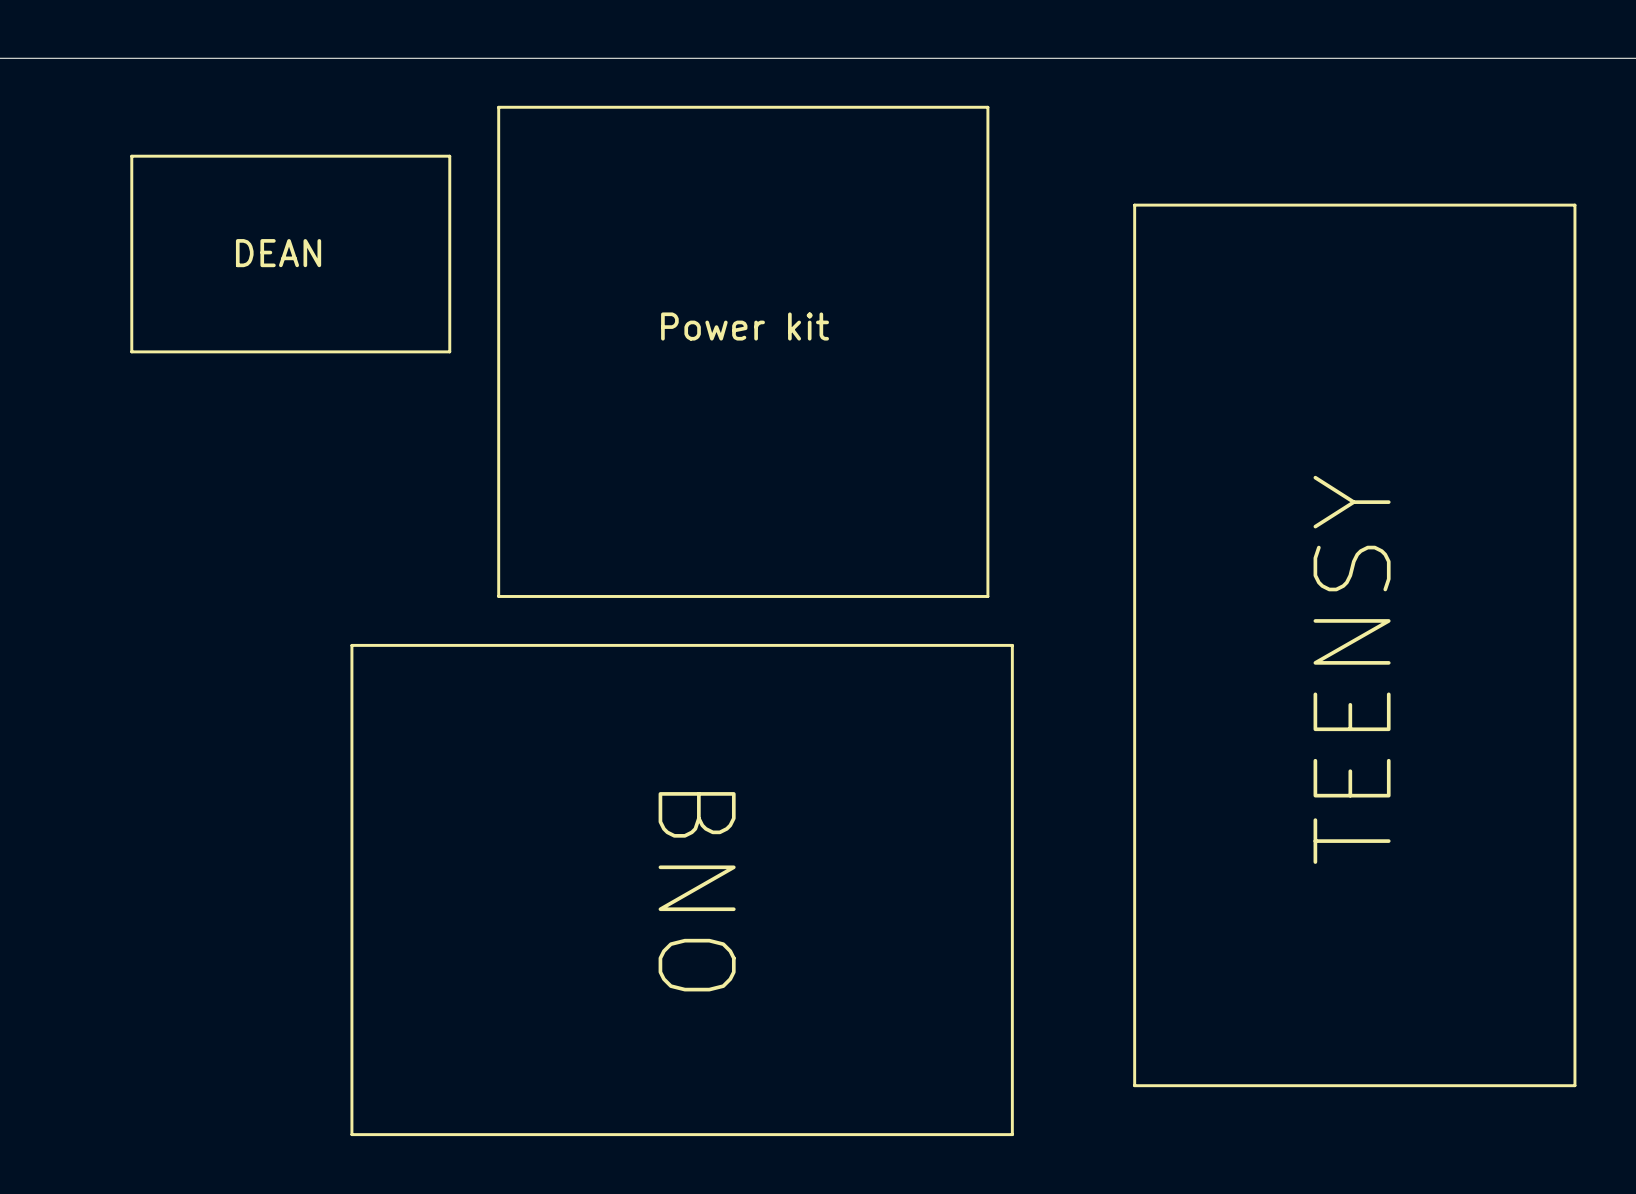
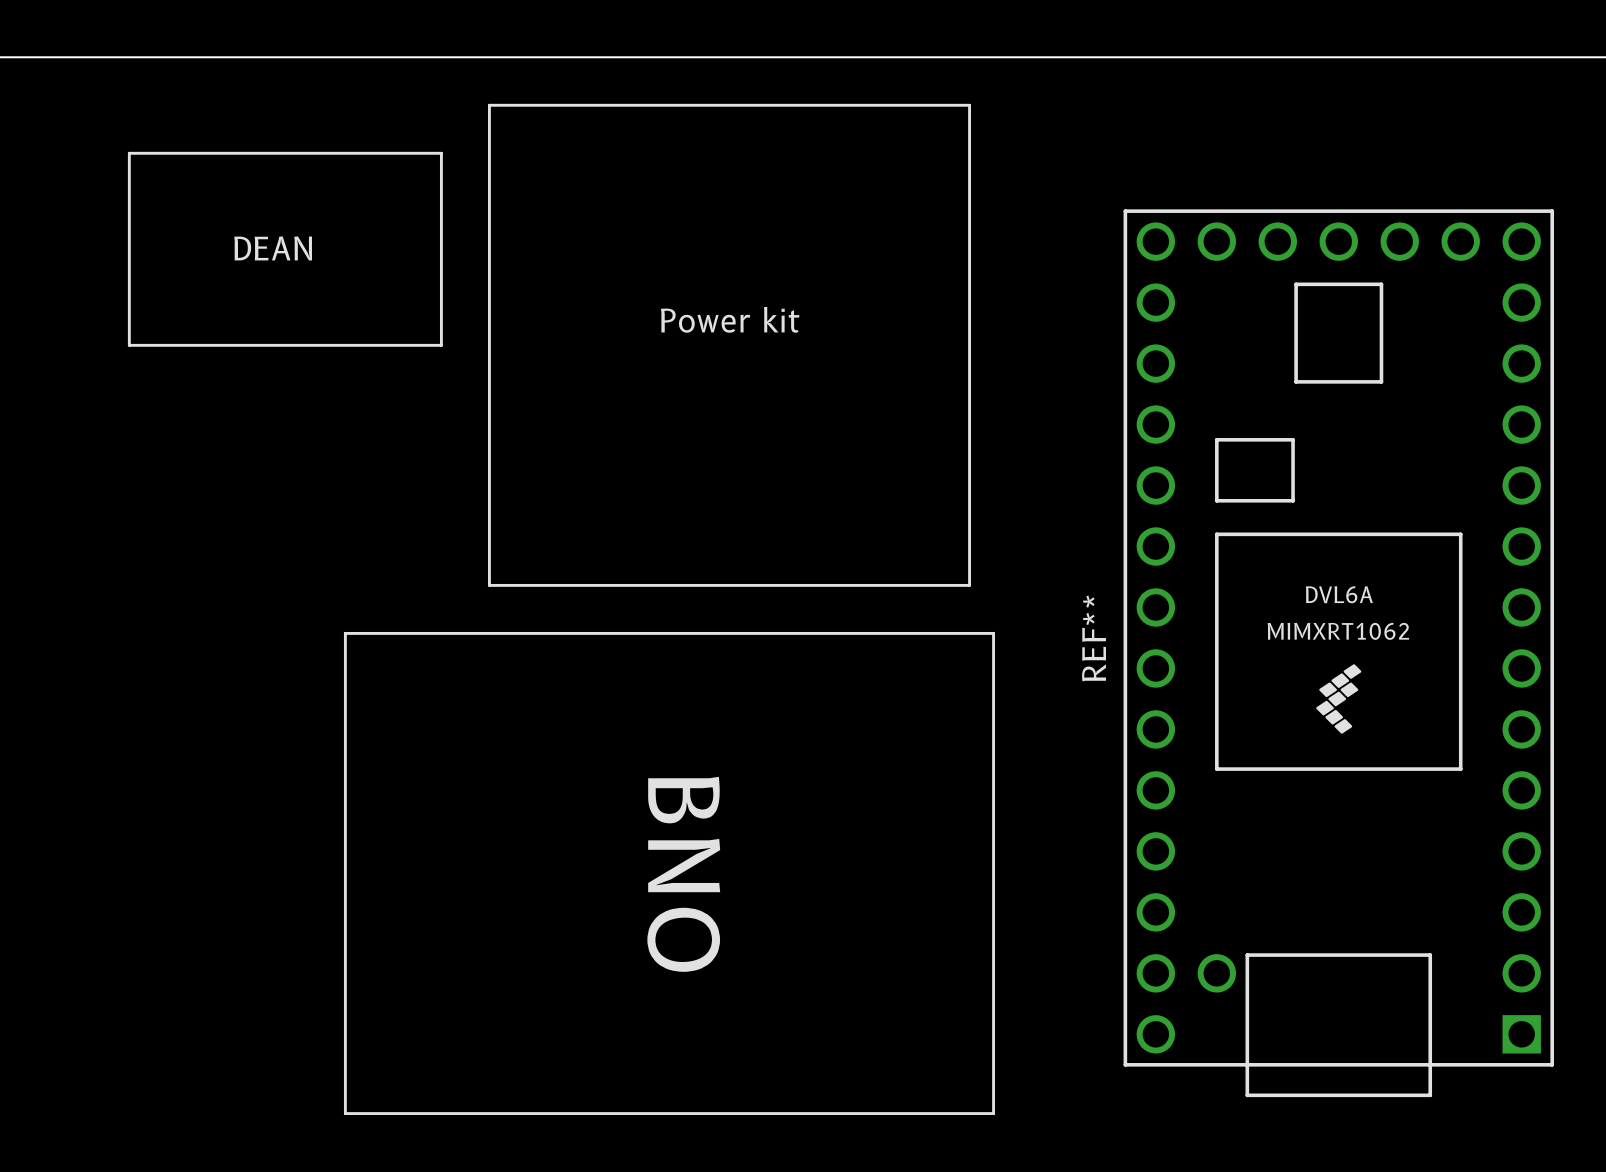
line: (1134, 205) (1134, 1085) (1574, 1085) (1574, 205) (1134, 205) -> none
REF**: none -> (1338, 653)
text: TEENSY (1352, 669) -> none

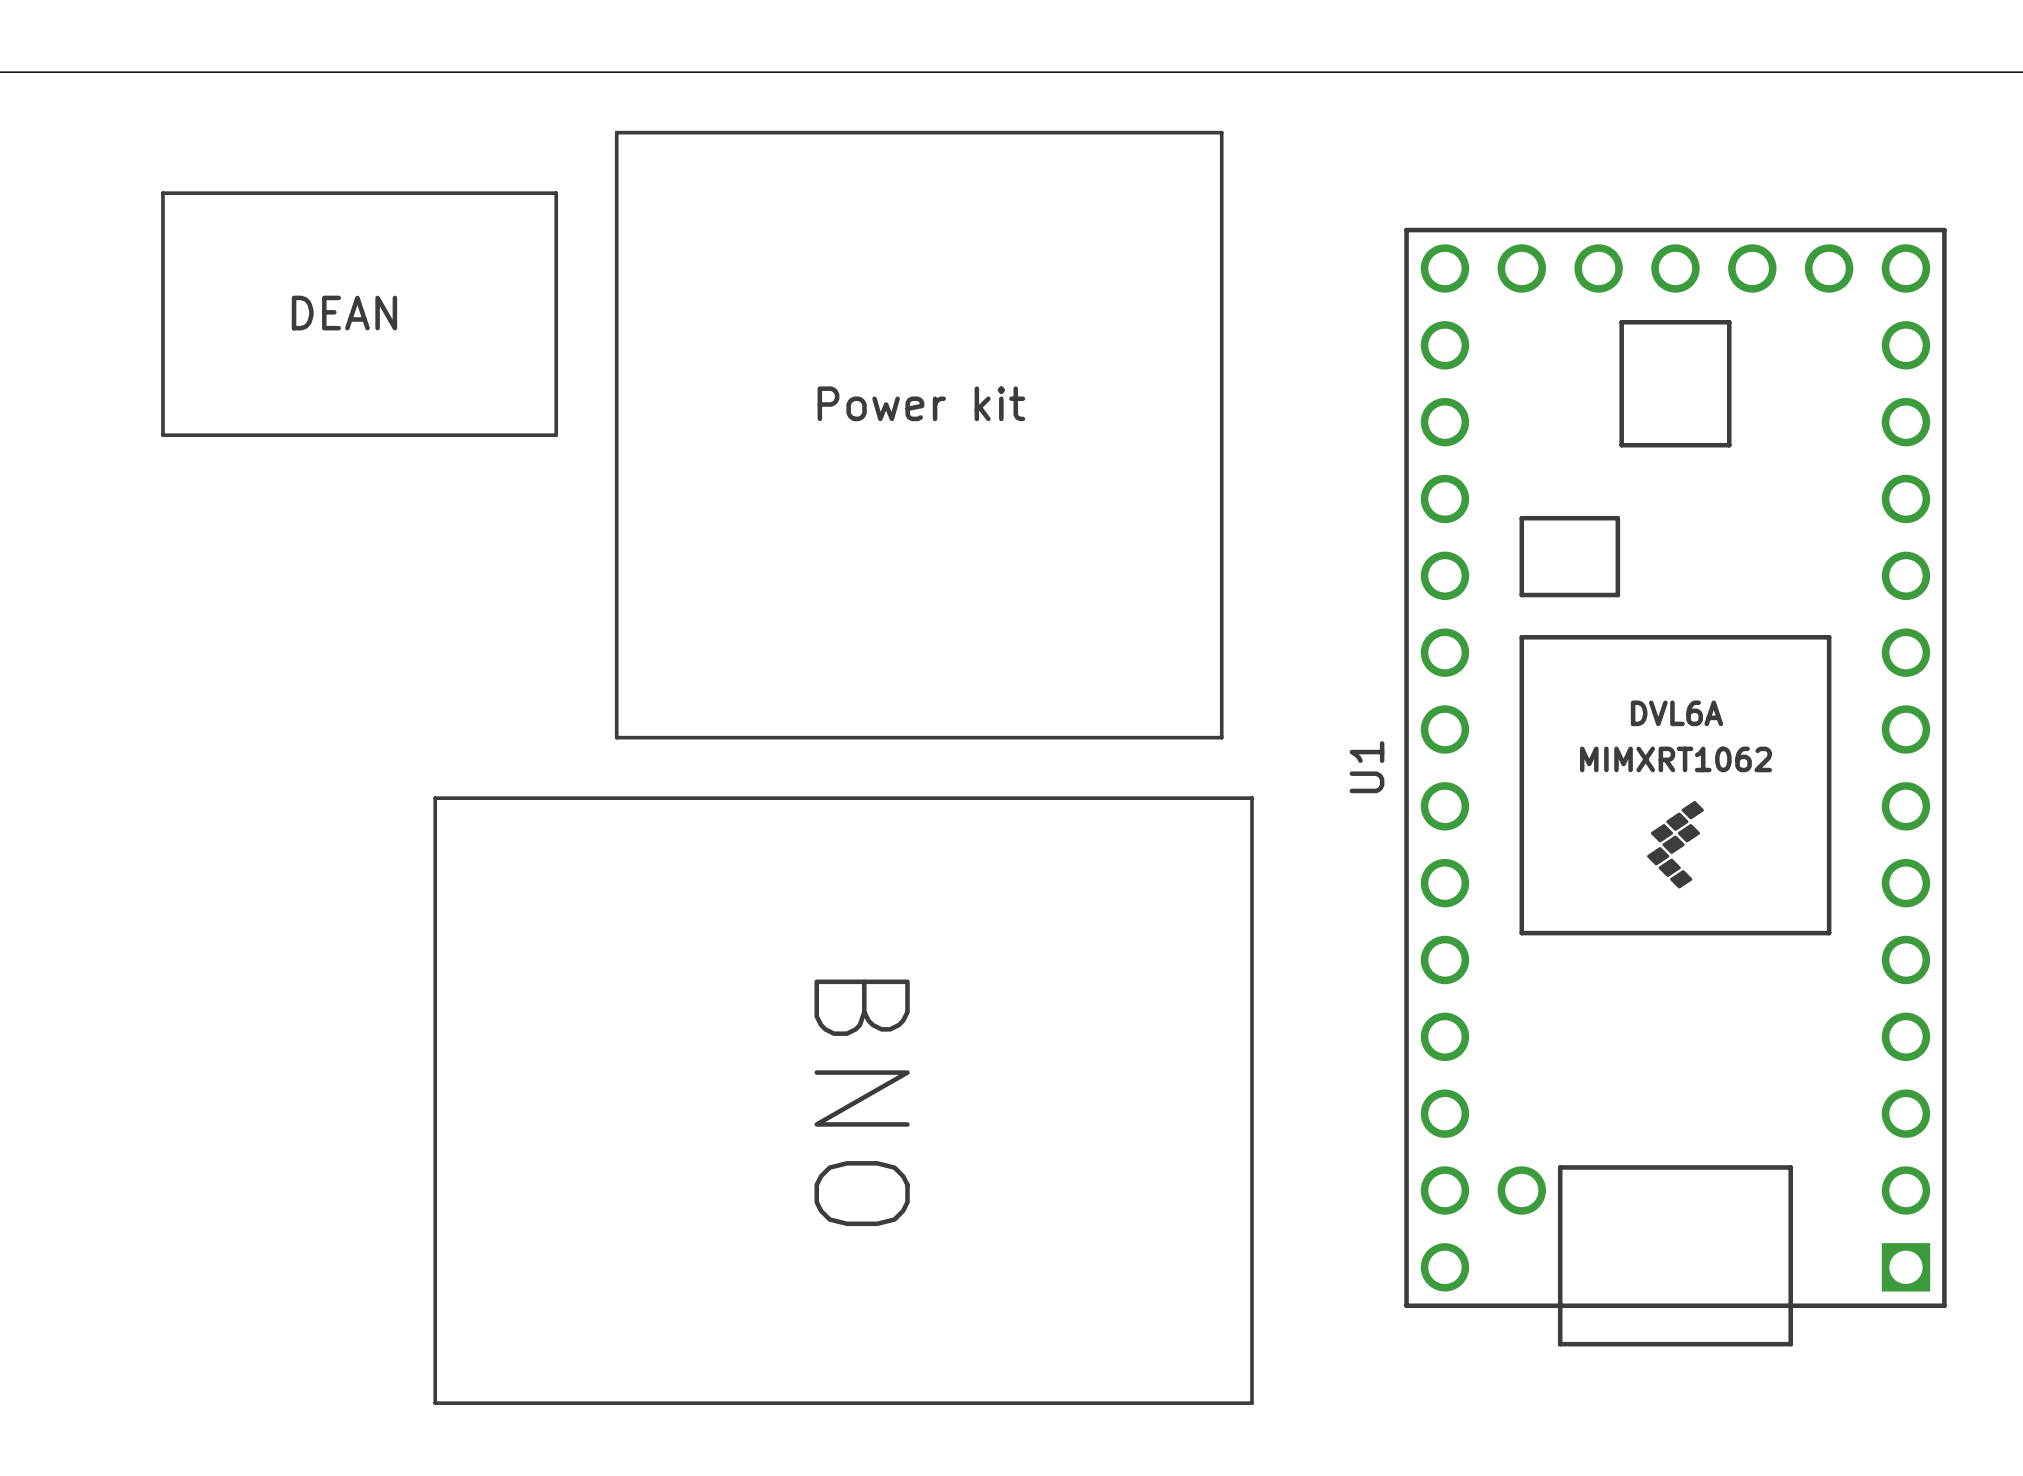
U1: none -> (1675, 787)
REF**: (1338, 653) -> none

